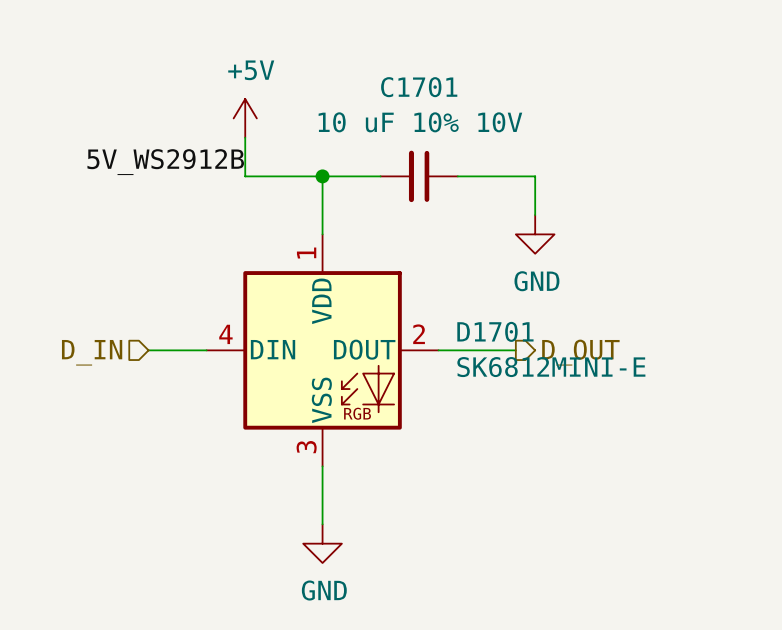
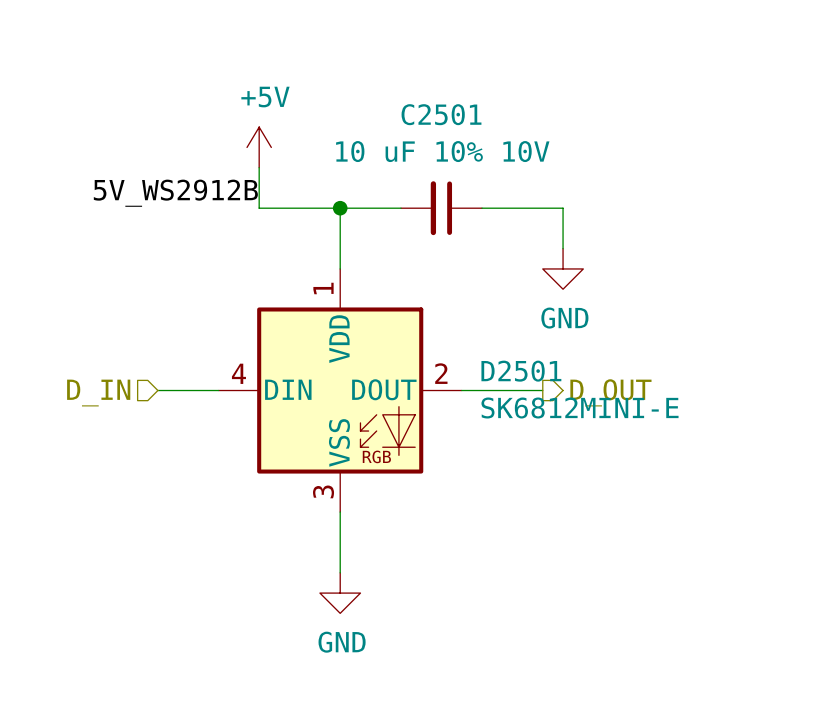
C1701 name: C1701 (419, 87) -> C2501 (441, 114)
D1701 name: D1701 (495, 331) -> D2501 (521, 371)

